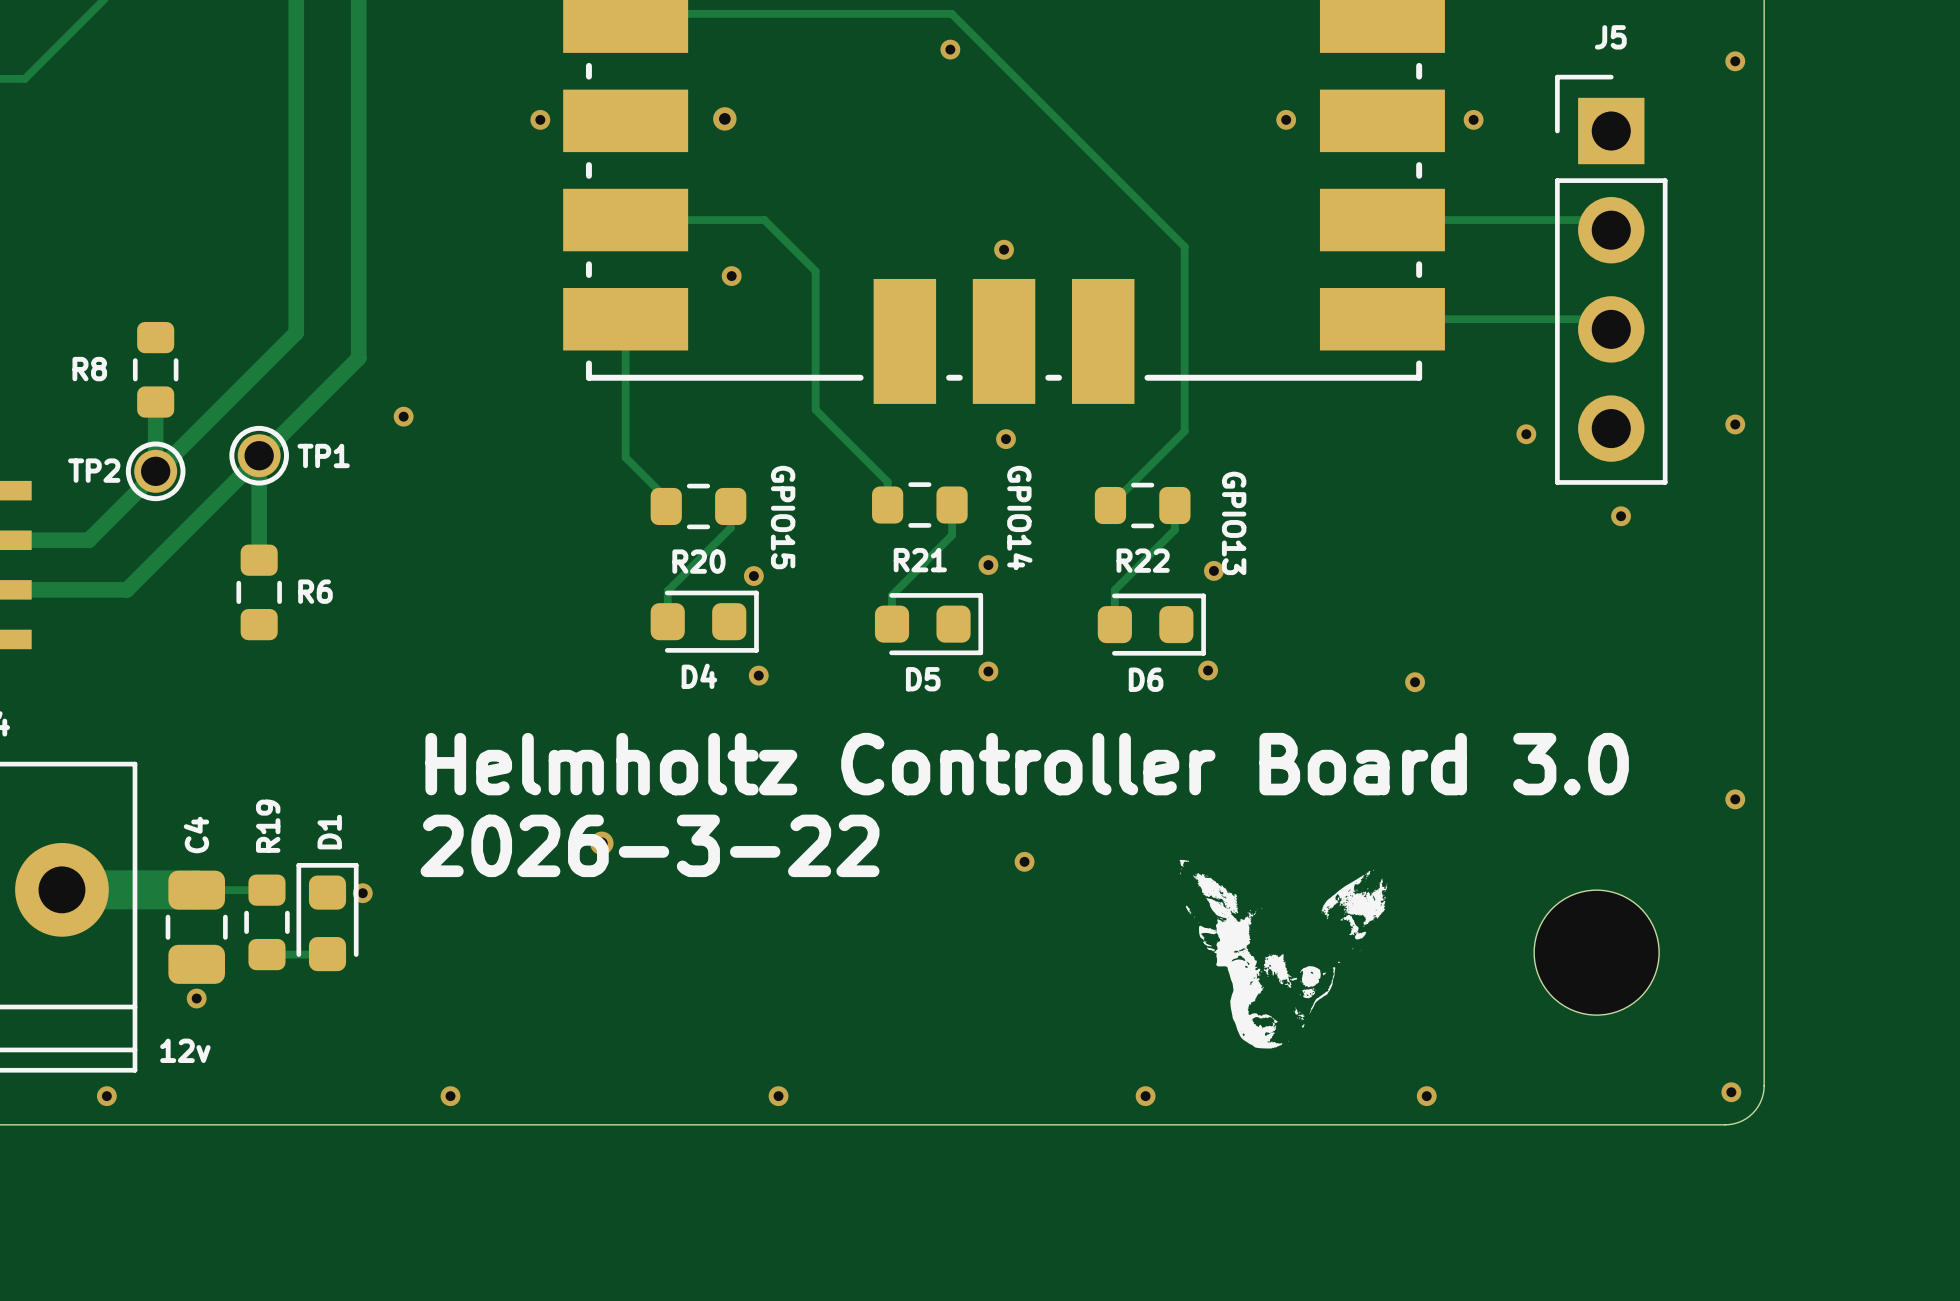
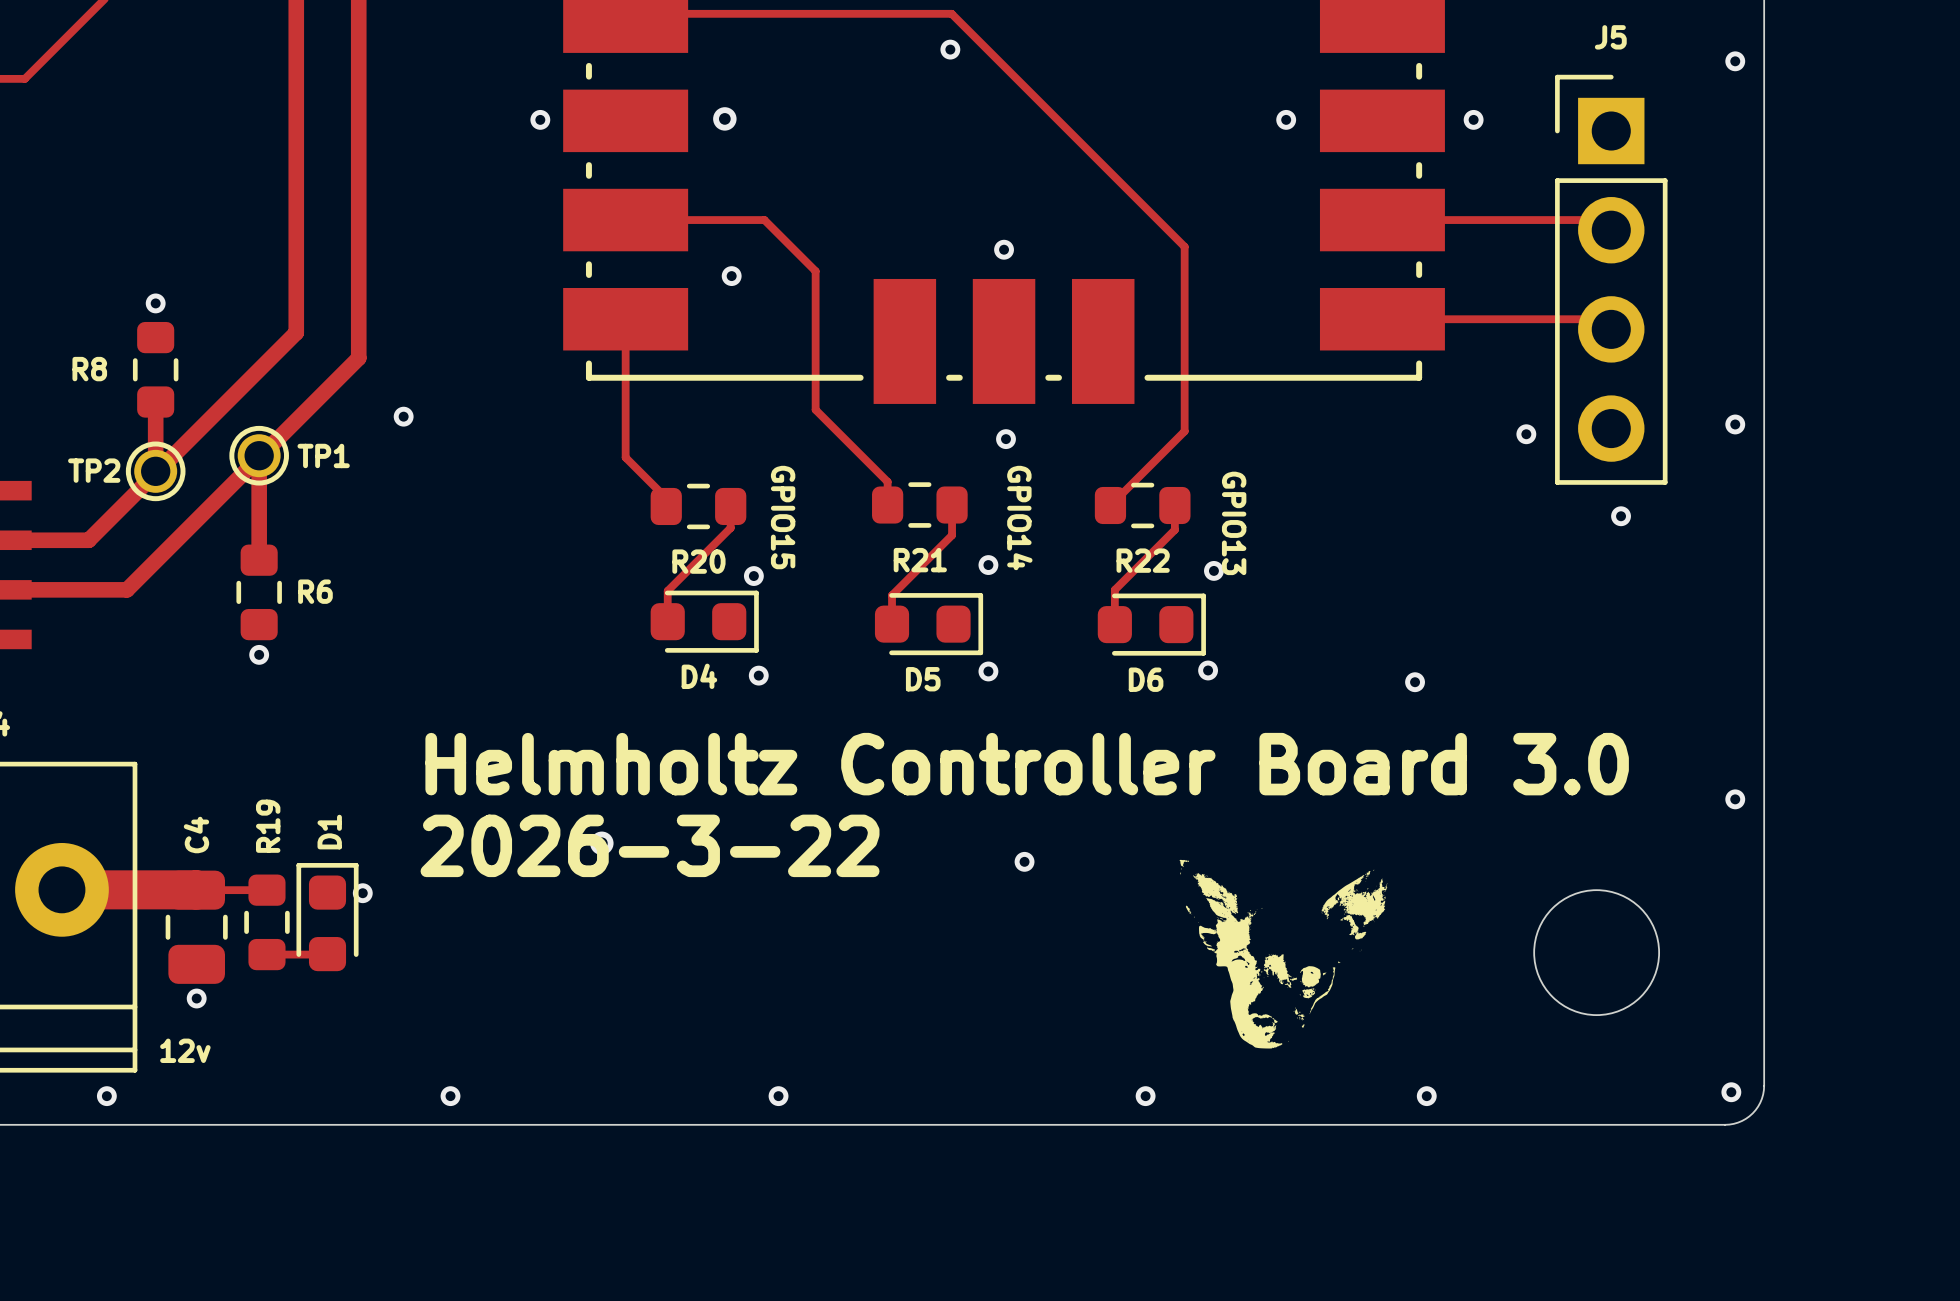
via: none -> (155, 303)
via: none -> (259, 654)

